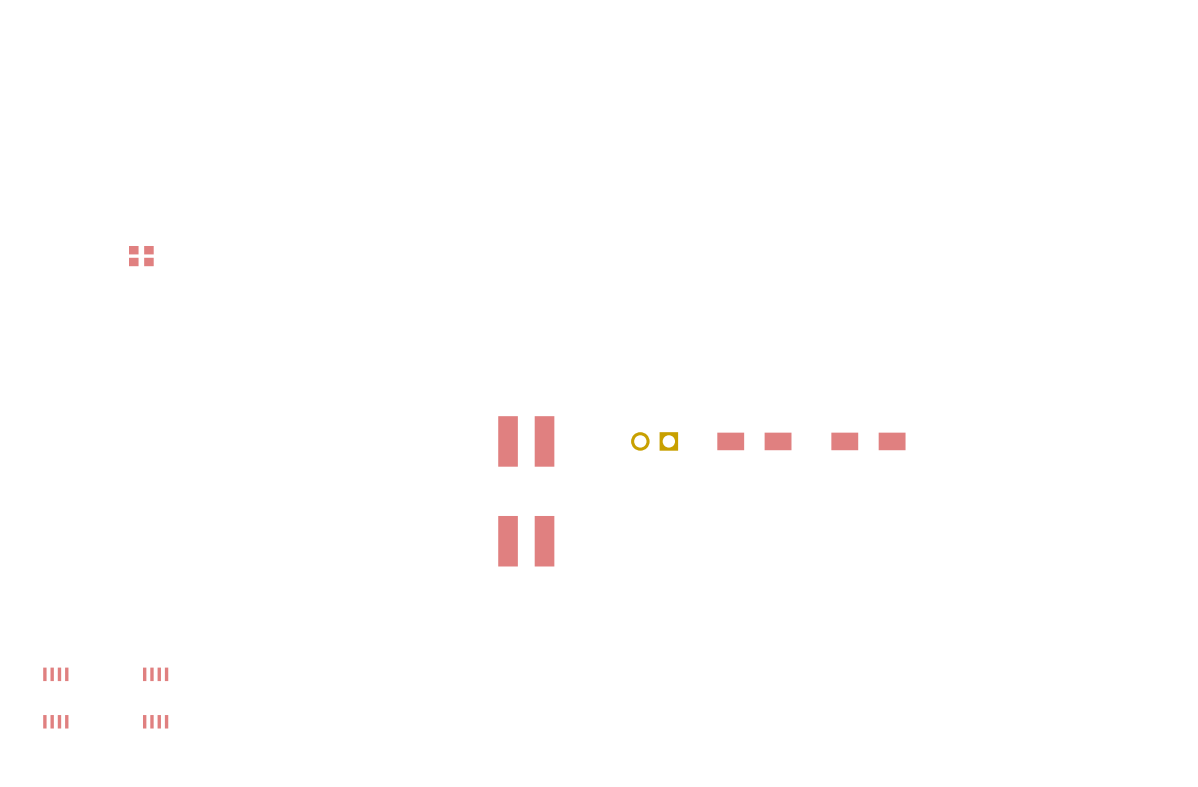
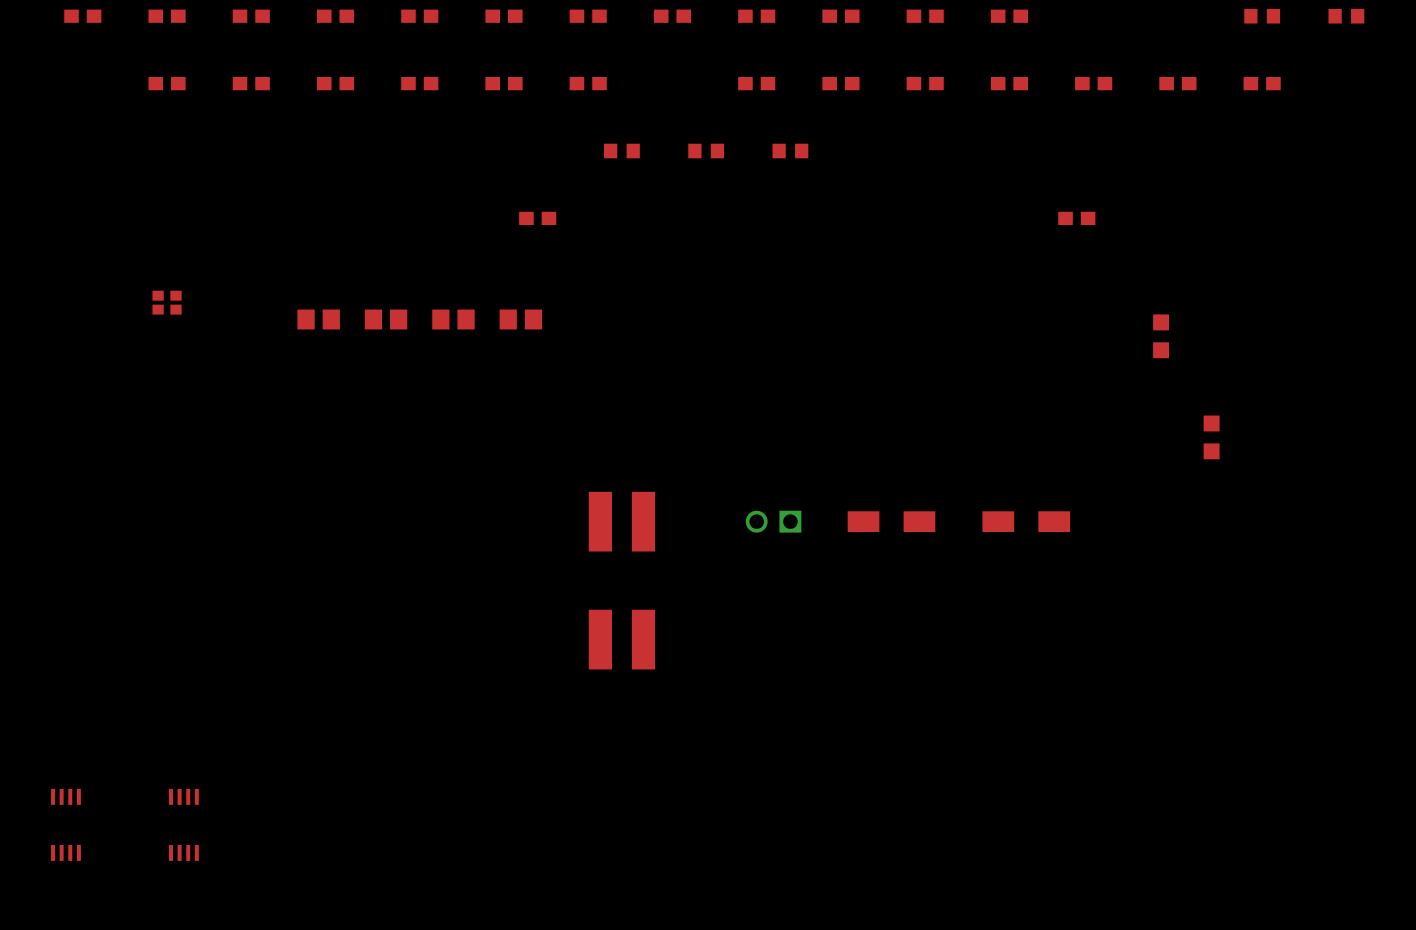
part: none -> (82, 16)
part: none -> (167, 16)
part: none -> (251, 16)
part: none -> (335, 16)
part: none -> (419, 16)
part: none -> (504, 16)
part: none -> (588, 16)
part: none -> (672, 16)
part: none -> (756, 16)
part: none -> (840, 16)
part: none -> (925, 16)
part: none -> (1009, 16)
part: none -> (1262, 16)
part: none -> (1346, 16)
part: none -> (167, 83)
part: none -> (251, 83)
part: none -> (335, 83)
part: none -> (419, 83)
part: none -> (504, 83)
part: none -> (588, 83)
part: none -> (756, 83)
part: none -> (840, 83)
part: none -> (925, 83)
part: none -> (1009, 83)
part: none -> (1093, 83)
part: none -> (1177, 83)
part: none -> (1262, 83)
part: none -> (621, 151)
part: none -> (706, 151)
part: none -> (790, 151)
part: none -> (537, 218)
part: none -> (1076, 218)
part: none -> (318, 319)
part: none -> (386, 319)
part: none -> (453, 319)
part: none -> (520, 319)
part: none -> (1161, 336)
part: none -> (1211, 437)

